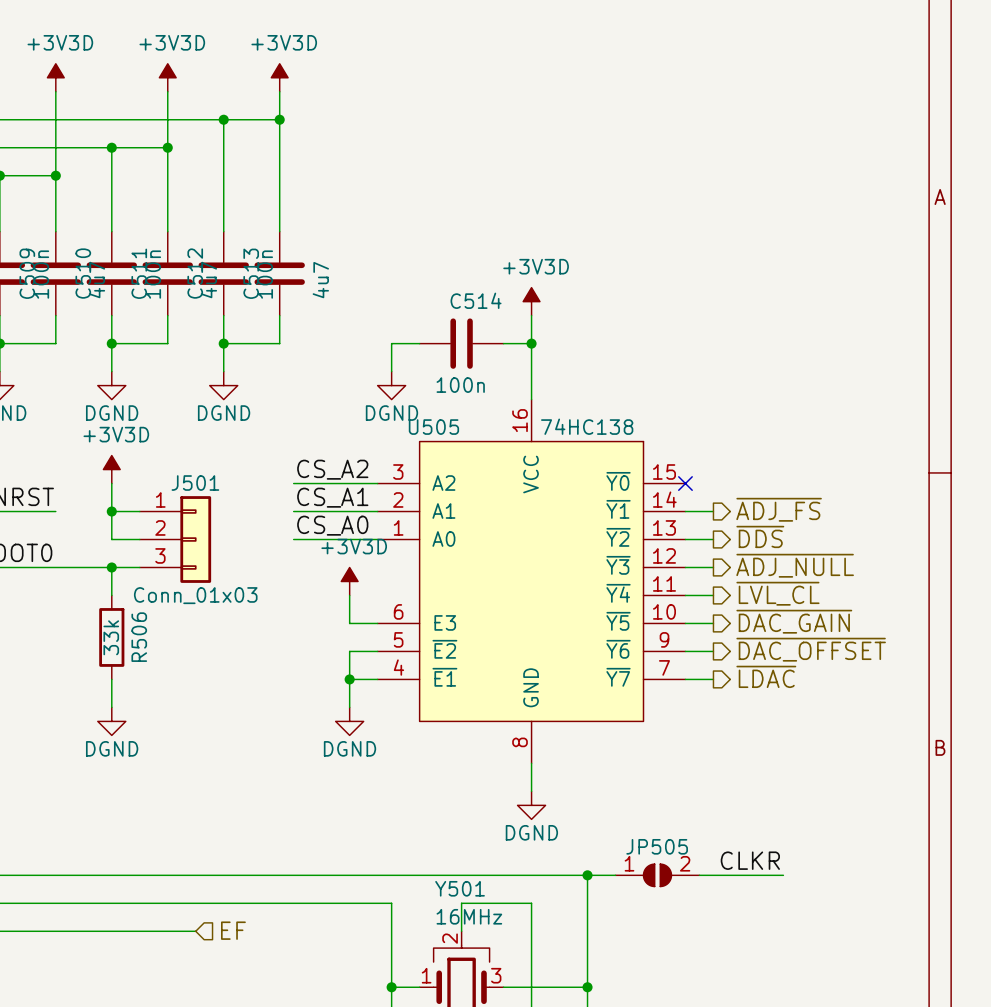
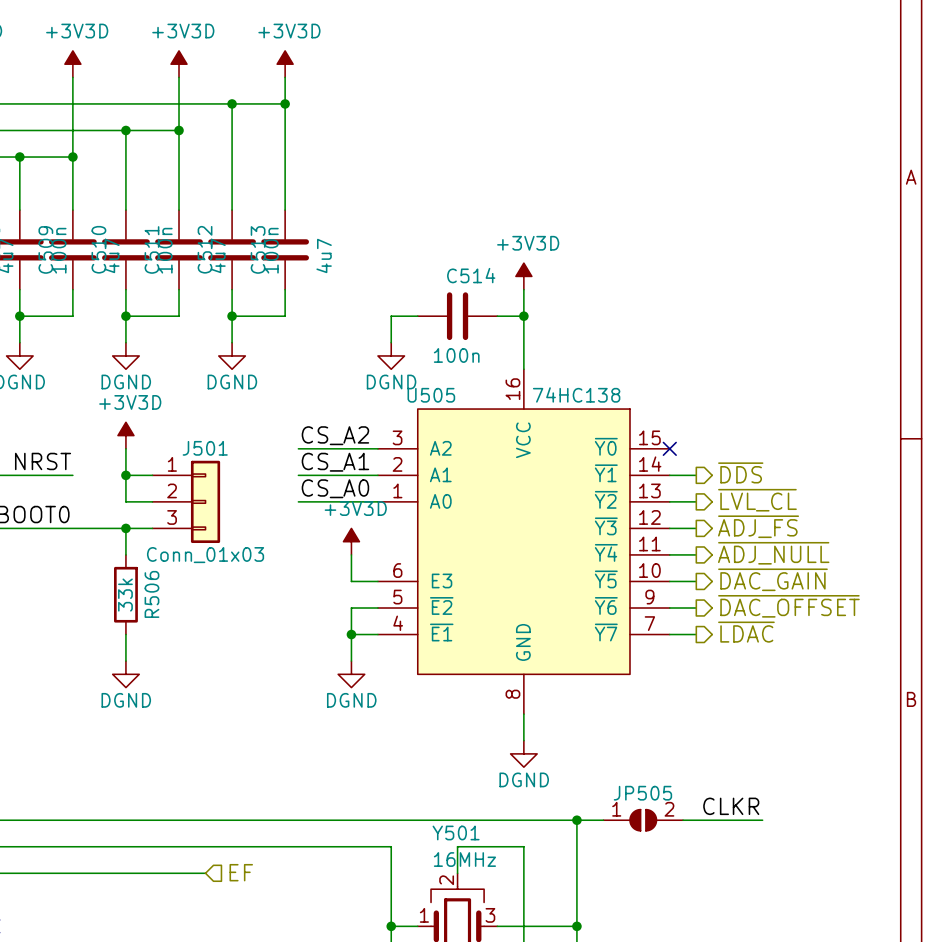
hierarchical label: ~{ADJ_FS} (779, 509) -> ~{DDS} (740, 472)
hierarchical label: ~{DDS} (760, 536) -> ~{LVL_CL} (757, 500)
hierarchical label: ~{ADJ_NULL} (795, 565) -> ~{ADJ_FS} (758, 526)
hierarchical label: ~{LVL_CL} (777, 593) -> ~{ADJ_NULL} (773, 553)

